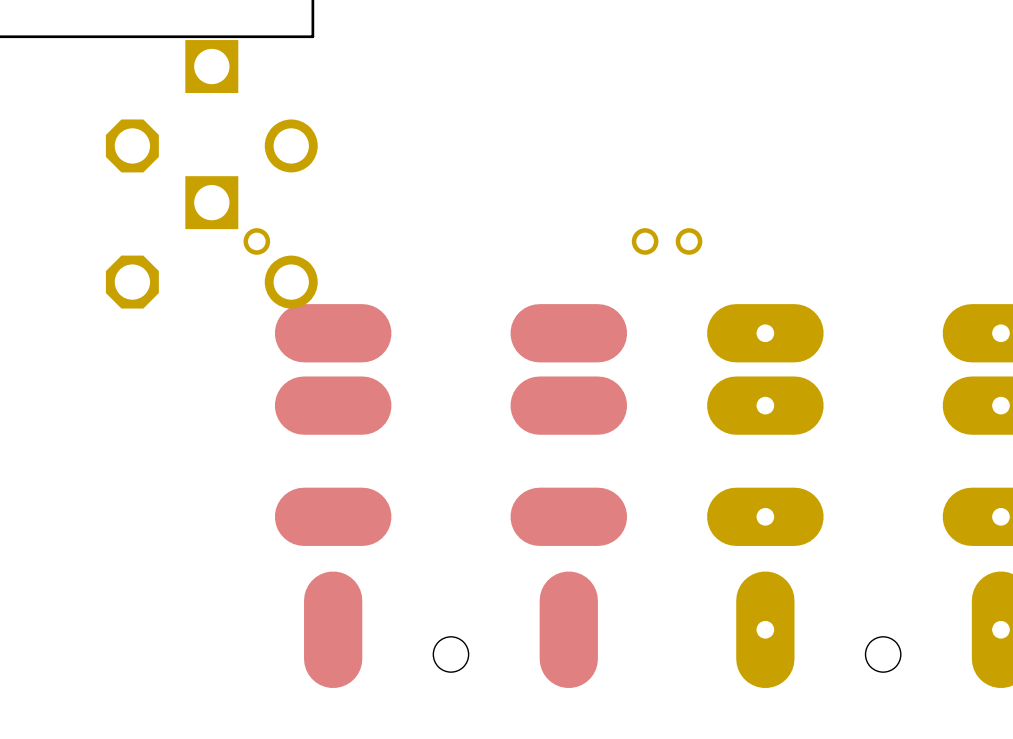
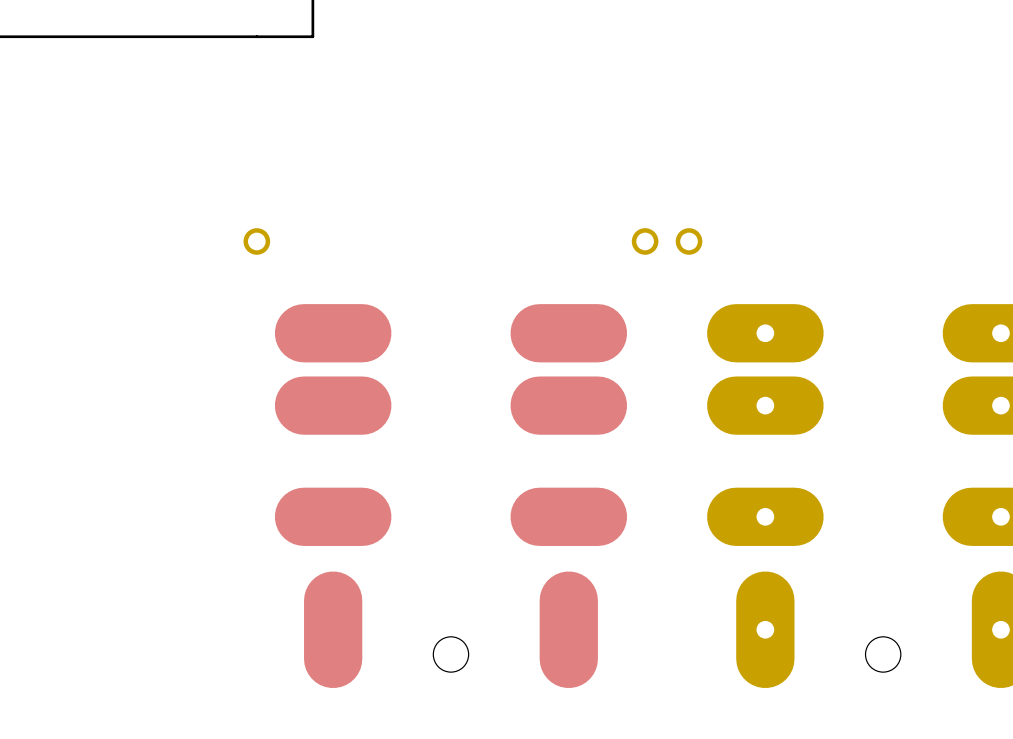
part: (211, 106) -> none
part: (211, 242) -> none

